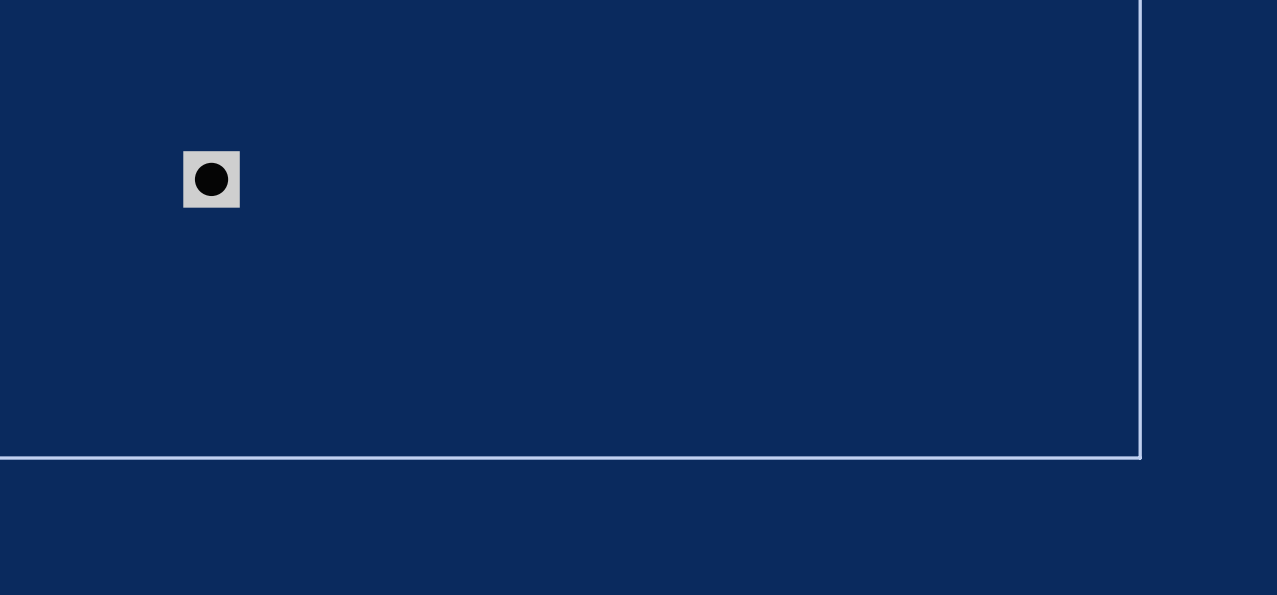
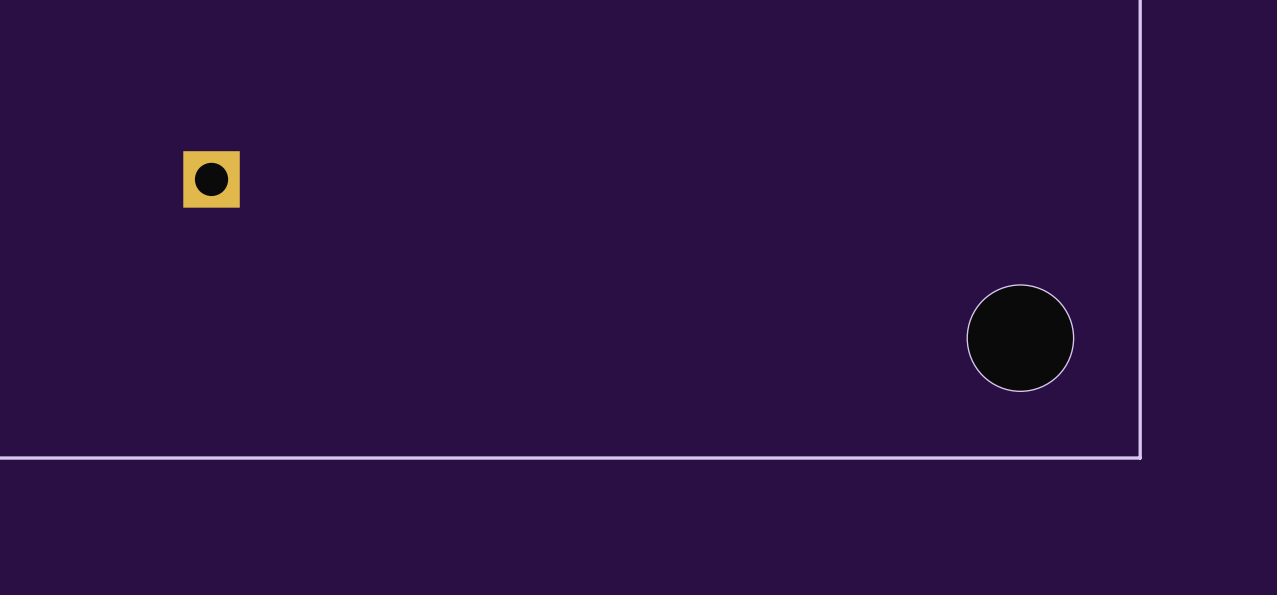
part: none -> (1020, 338)

